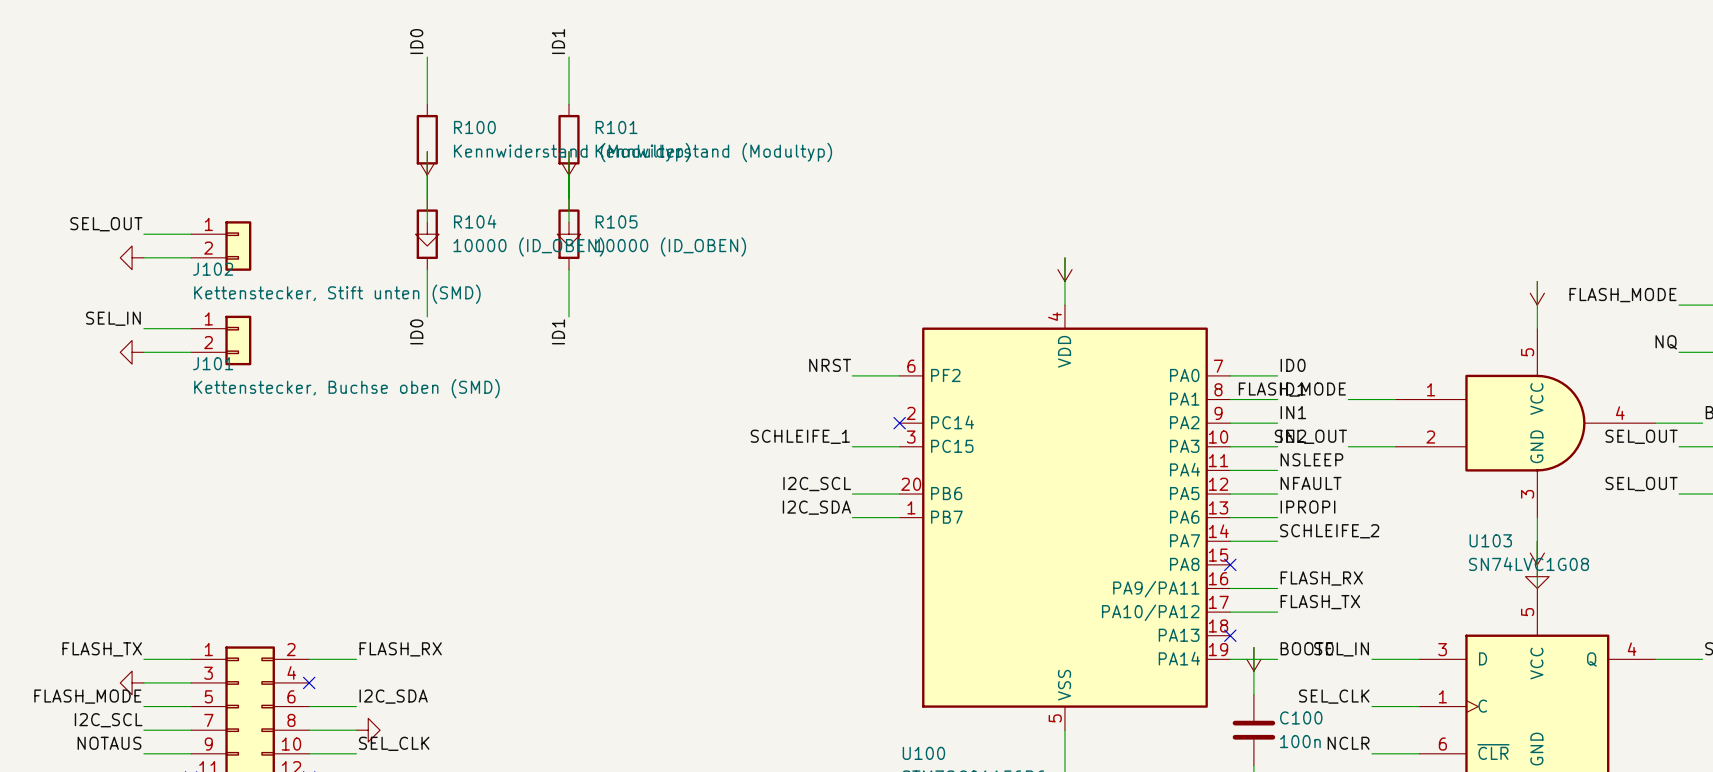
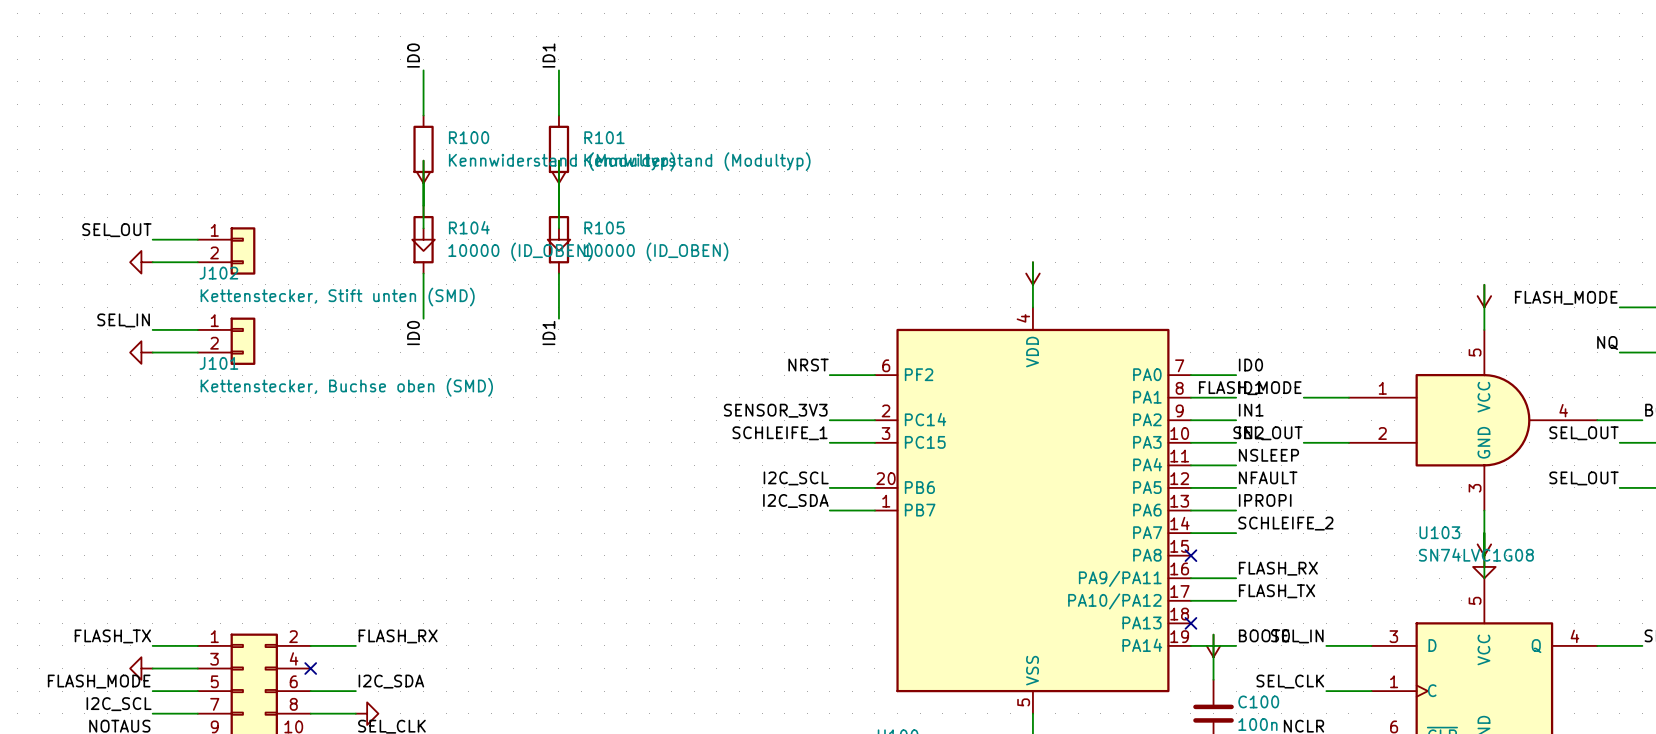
label: none -> SENSOR_3V3 (775, 410)
wire: none -> (829, 420) (874, 420)
no-connect mark: (899, 423) -> none

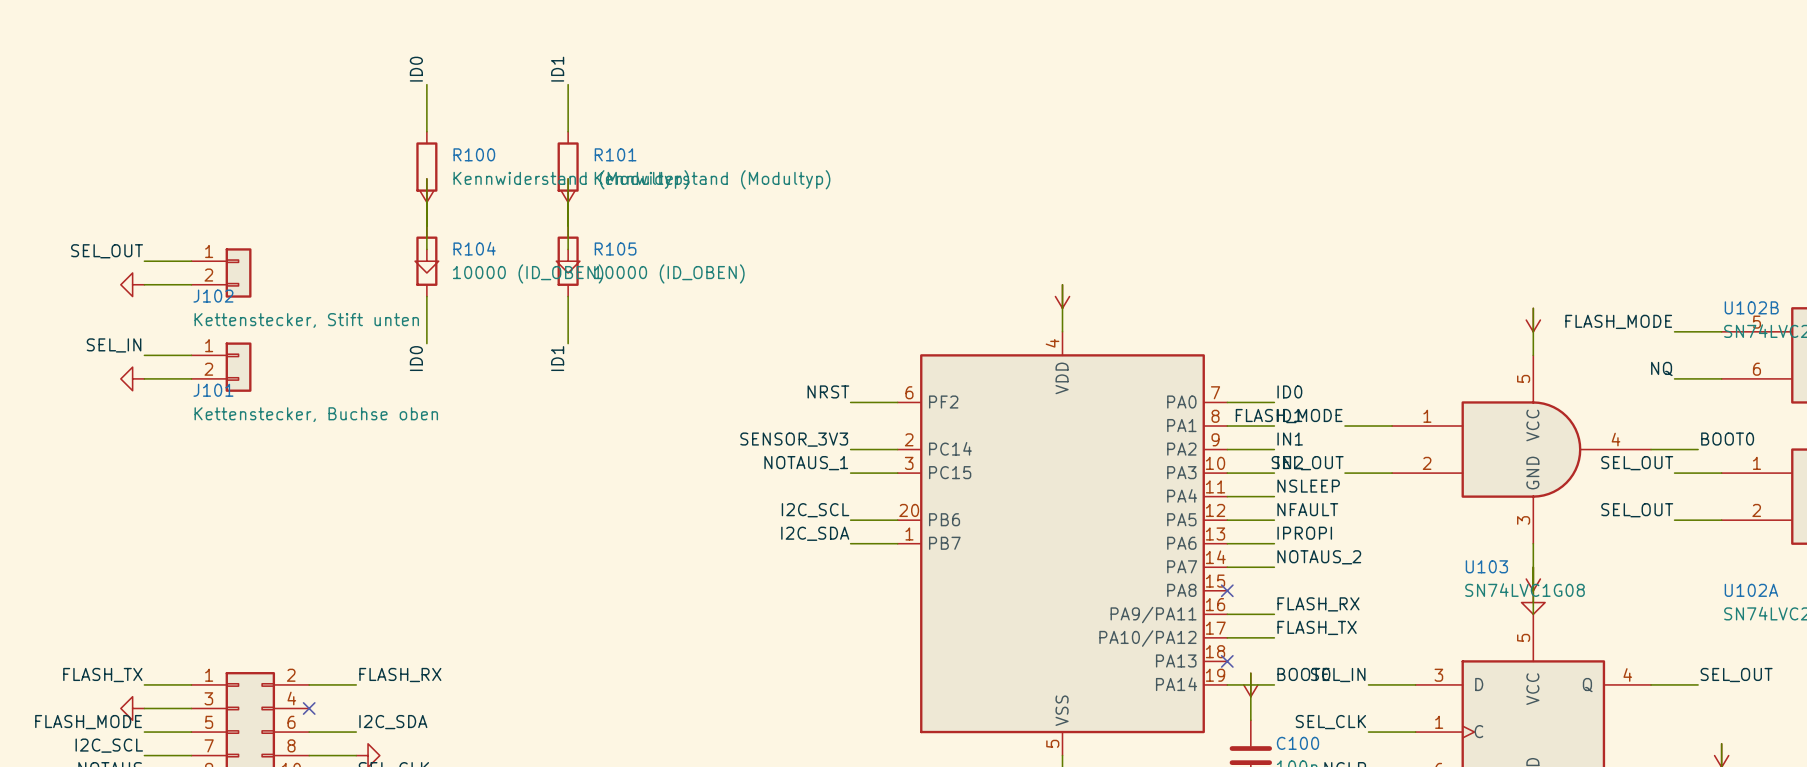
J102 value: Kettenstecker, Stift unten (SMD) (337, 297) -> Kettenstecker, Stift unten (306, 320)
J101 value: Kettenstecker, Buchse oben (SMD) (346, 387) -> Kettenstecker, Buchse oben (316, 414)
label: SCHLEIFE_1 (780, 433) -> NOTAUS_1 (806, 463)
label: SCHLEIFE_2 (1285, 523) -> NOTAUS_2 (1319, 557)

